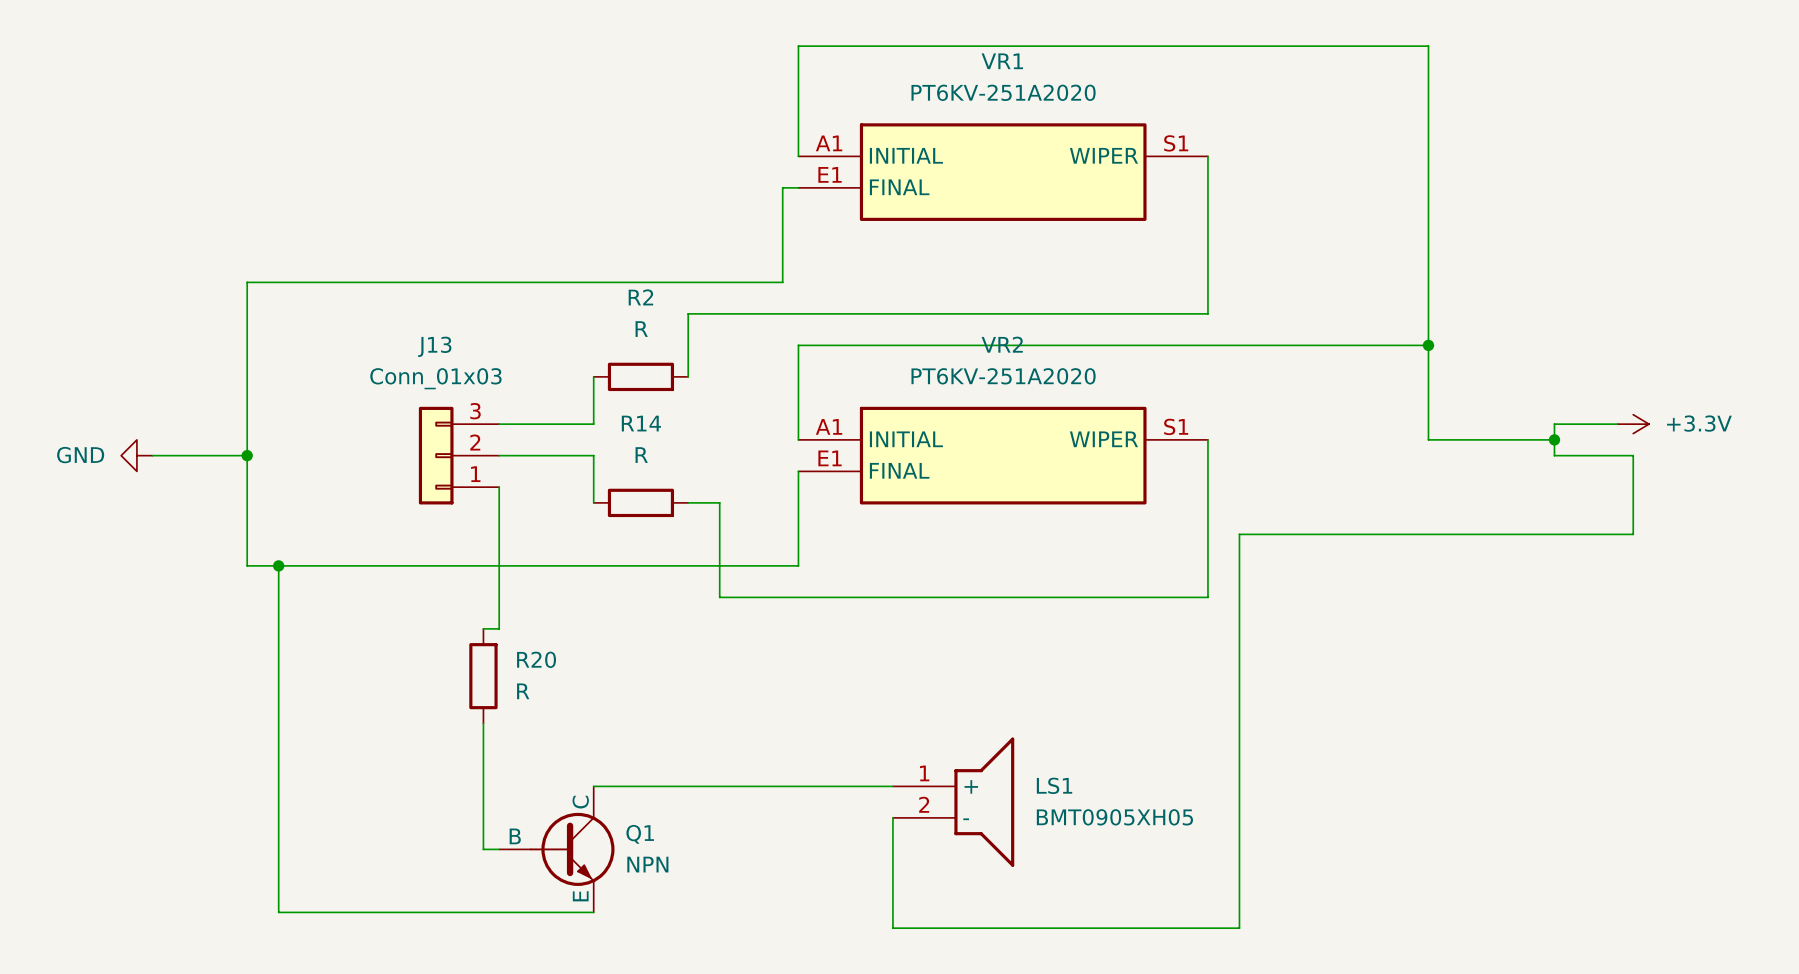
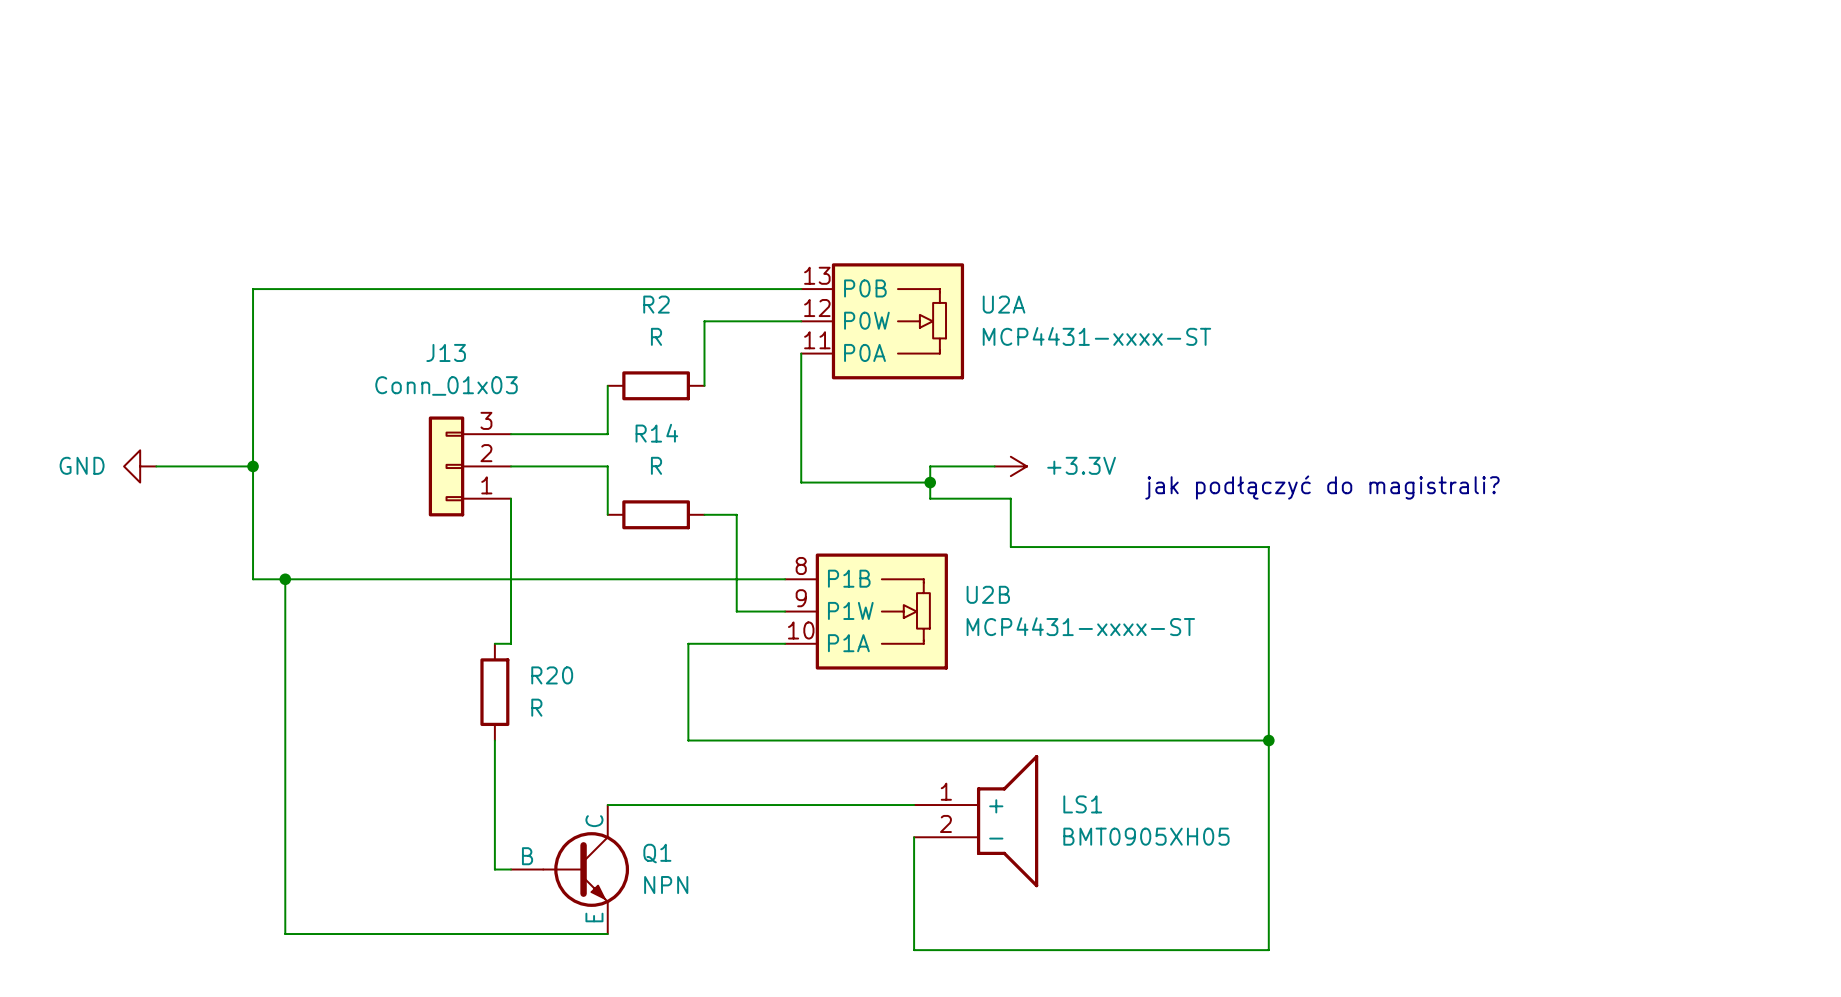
wire: (798, 156) (798, 46) (1428, 46) (1428, 439) (1554, 439) -> none
wire: (1207, 156) (1207, 313) (782, 313) -> none
VR1: PT6KV-251A2020 (1003, 172) -> none
wire: (798, 187) (782, 187) (782, 282) -> none
U2A: none -> MCP4431-xxxx-ST (882, 321)
wire: none -> (801, 353) (801, 482) (930, 482)
wire: (1428, 345) (798, 345) (798, 439) -> none
junction: (1428, 345) -> none
wire: (1617, 424) (1554, 424) (1554, 455) (1633, 455) (1633, 534) (1239, 534) -> (994, 466) (930, 466) (930, 498) (1010, 498) (1010, 547) (1268, 547)
power symbol: +3.3V (1633, 424) -> none
wire: (1207, 439) (1207, 597) (766, 597) -> none
junction: (1554, 439) -> none
power symbol: none -> +3.3V (1010, 466)
VR2: PT6KV-251A2020 (1003, 455) -> none
wire: (798, 471) (798, 565) (766, 565) -> none
junction: none -> (930, 482)
text: none -> jak podłączyć do magistrali? (1322, 487)
U2B: none -> MCP4431-xxxx-ST (866, 611)
wire: none -> (785, 643) (688, 643) (688, 740) (1268, 740)
junction: none -> (1268, 740)

